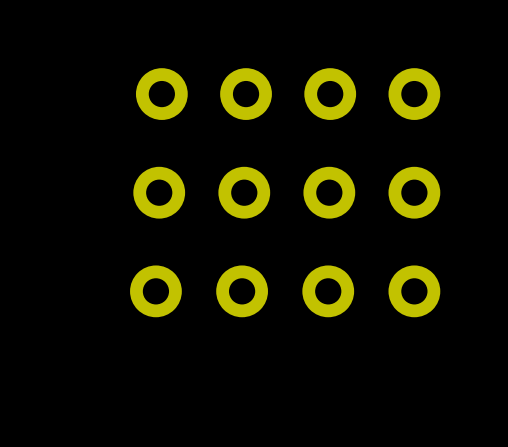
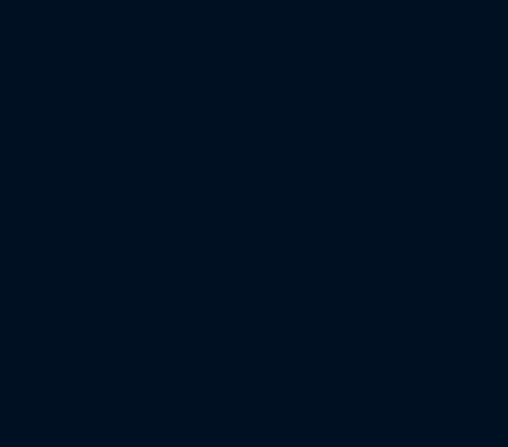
part: (285, 192) -> none

